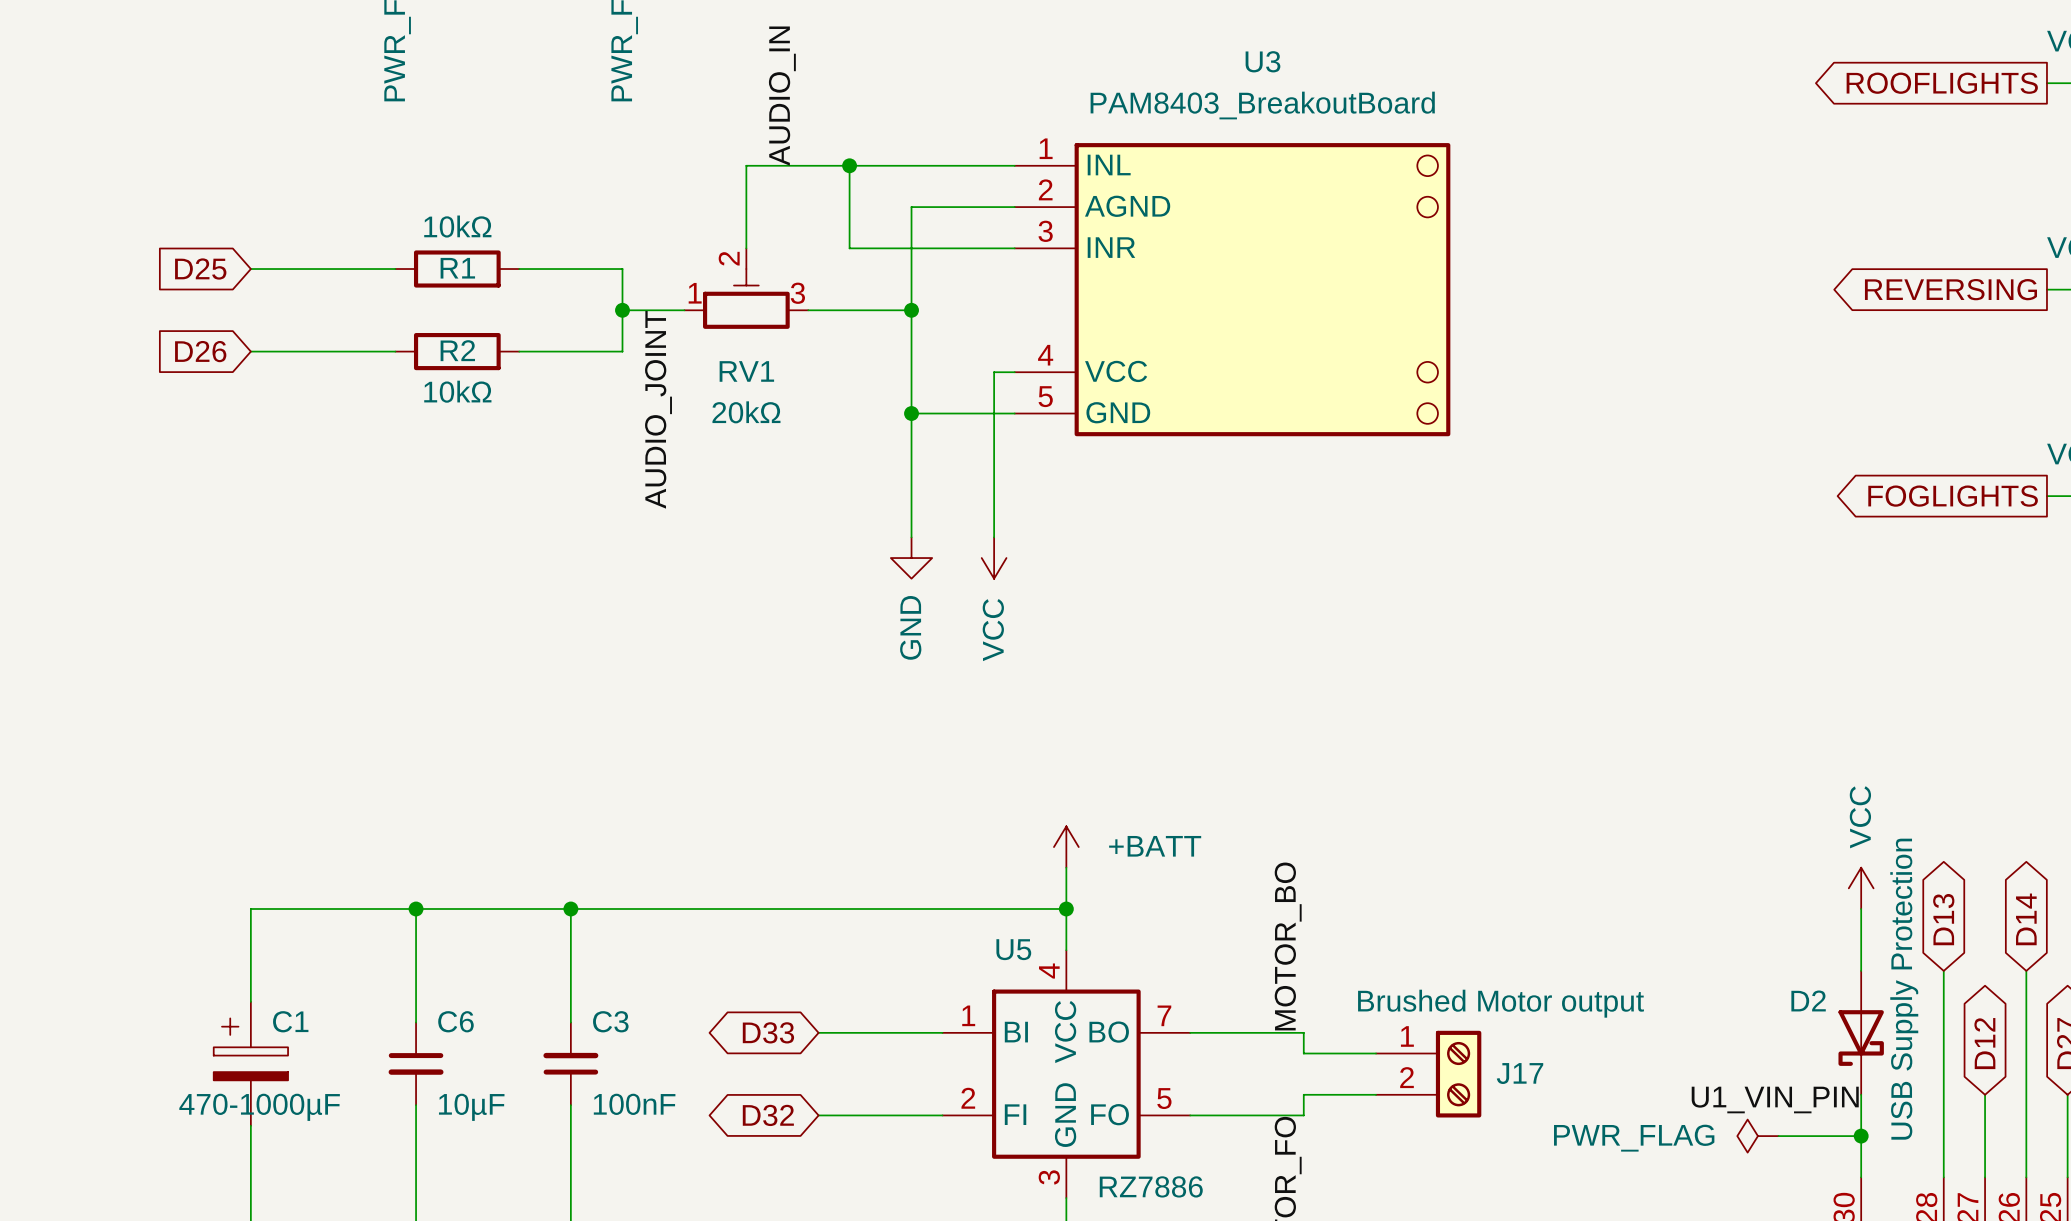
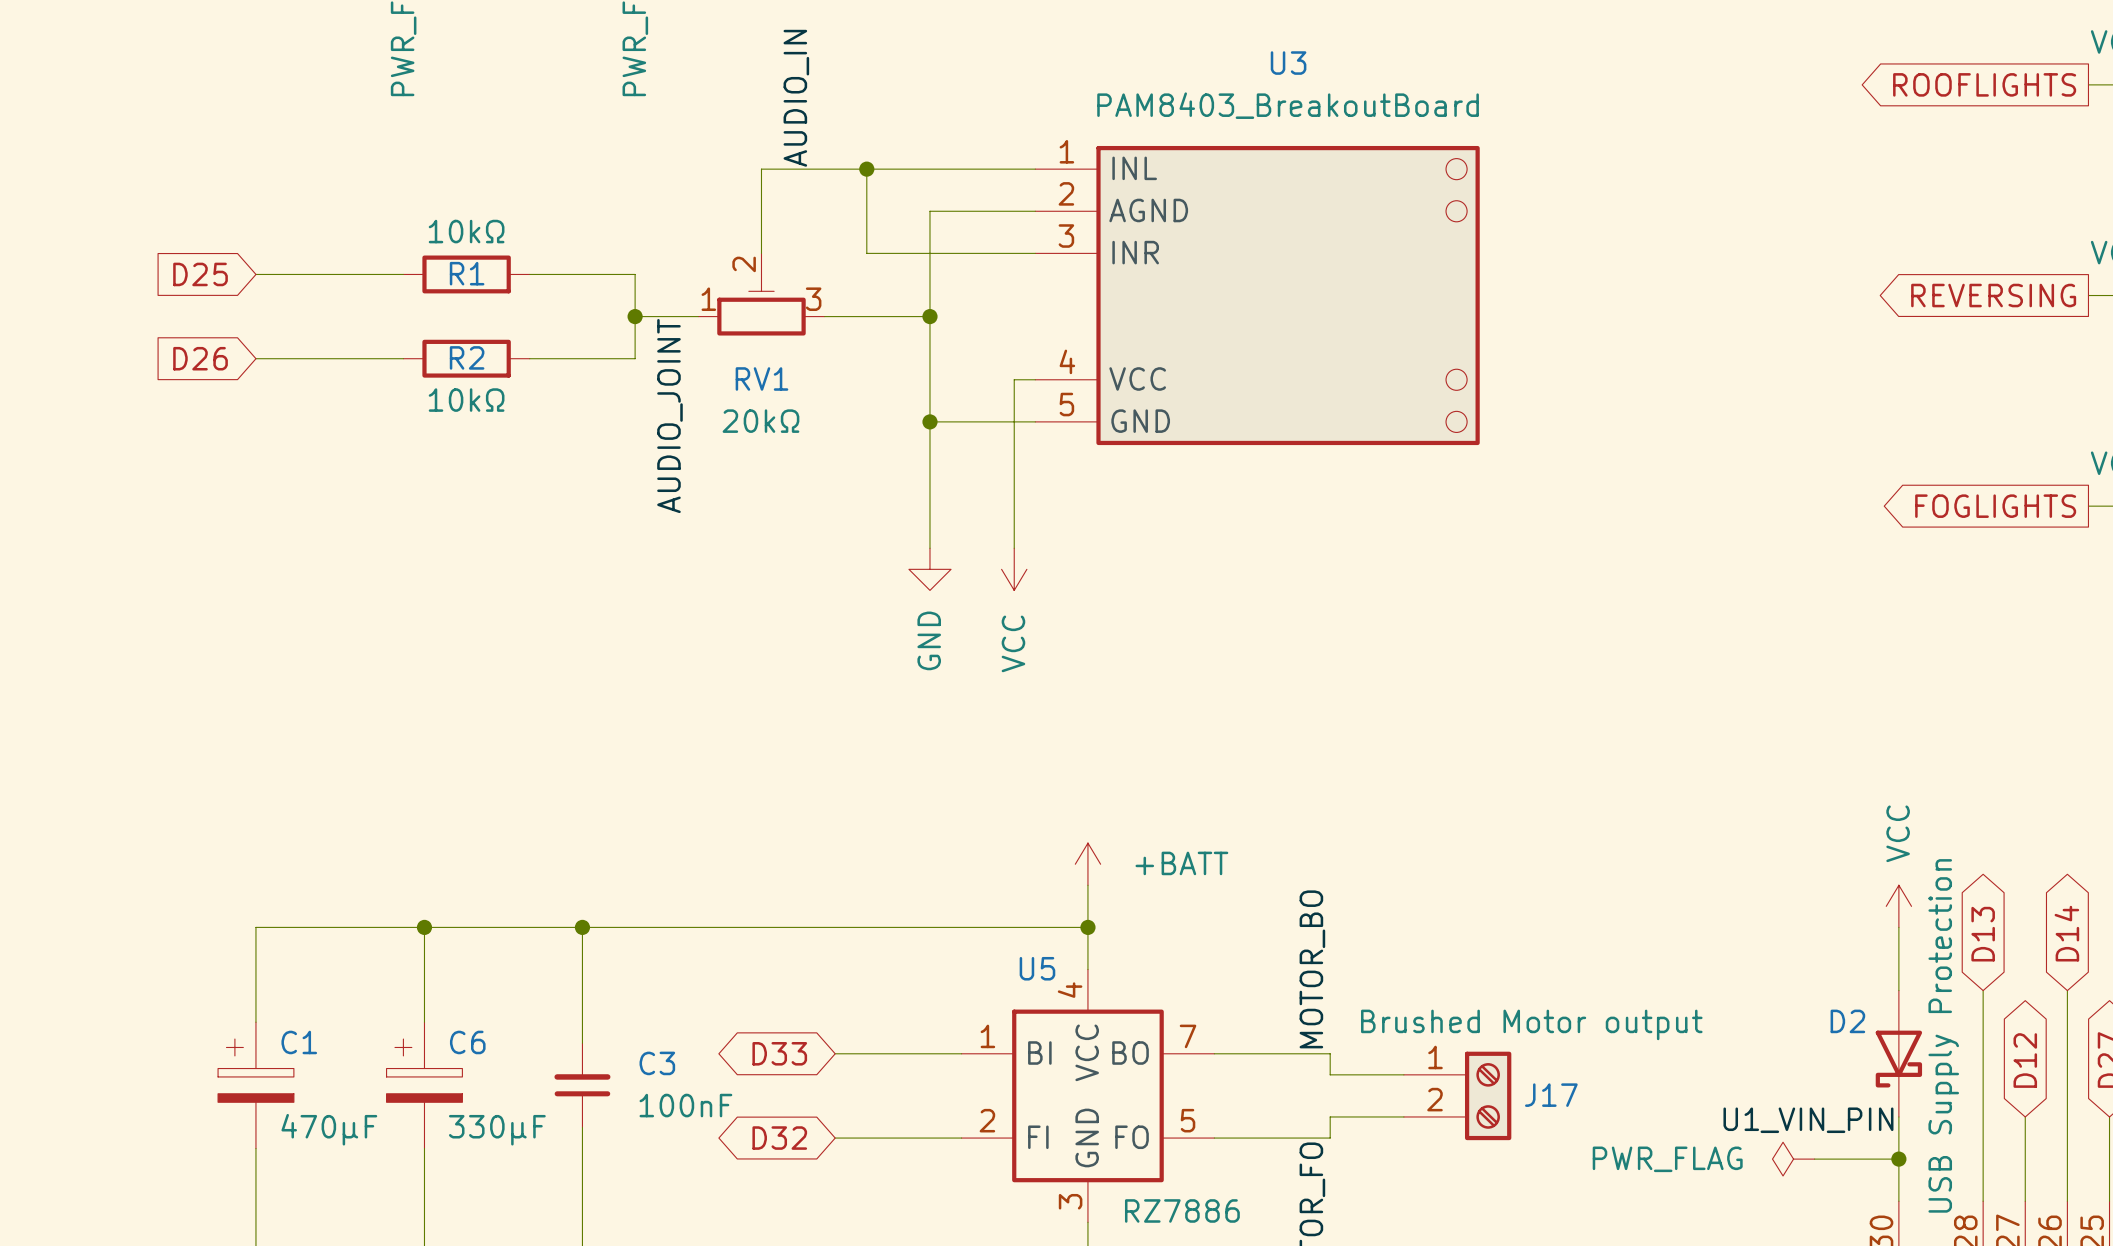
C3 name position: C3 (610, 1021) -> C3 (657, 1063)
C6 symbol: [388, 1022, 444, 1106] -> [386, 1022, 463, 1149]
C3 value position: 100nF (634, 1104) -> 100nF (685, 1105)
C1 value: 470-1000µF (259, 1107) -> 470µF (329, 1129)
C6 value: 10µF (471, 1107) -> 330µF (497, 1130)

